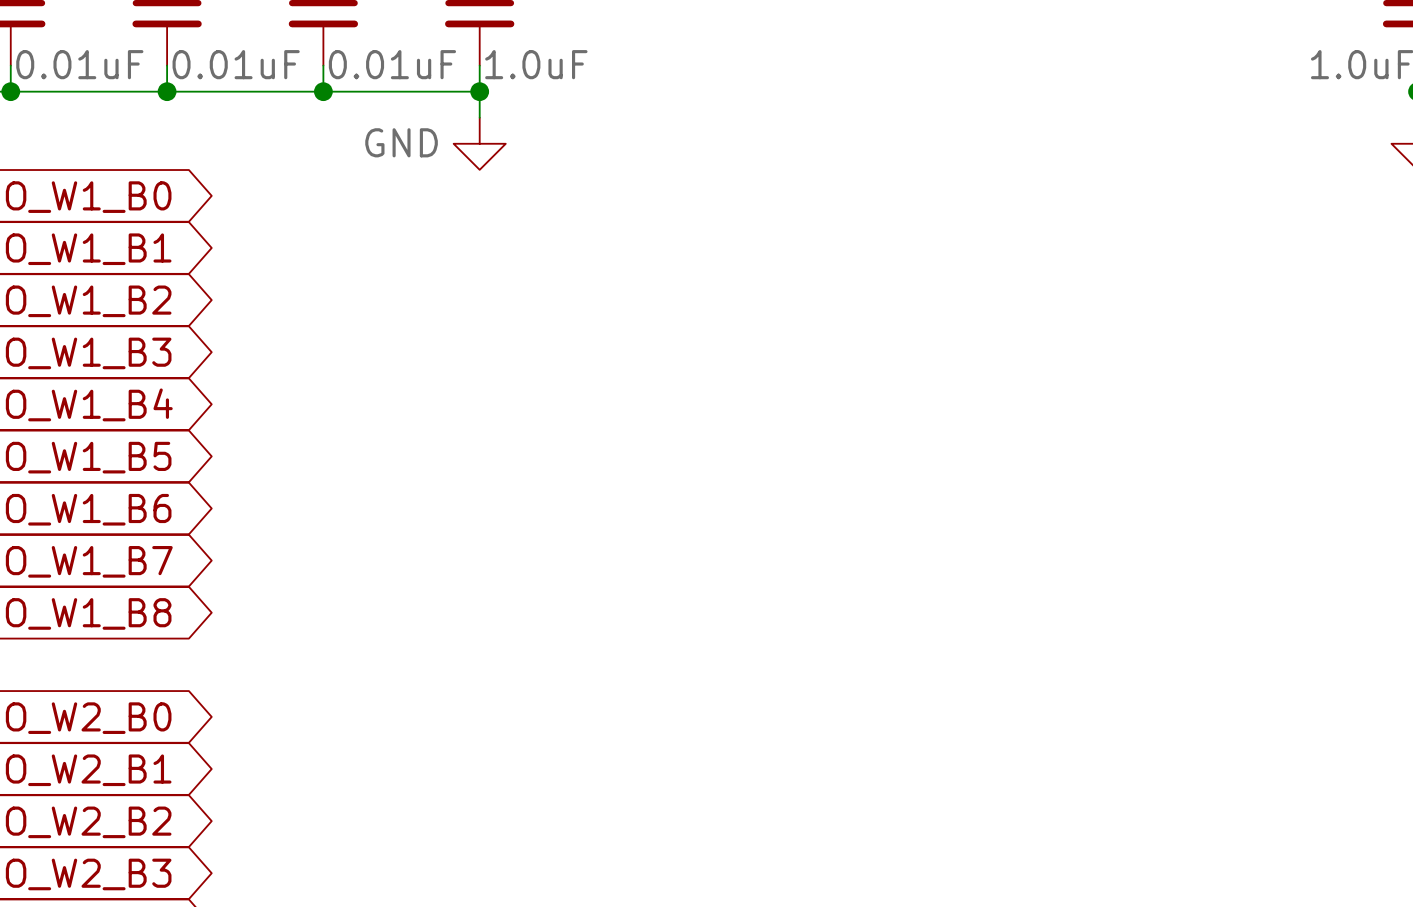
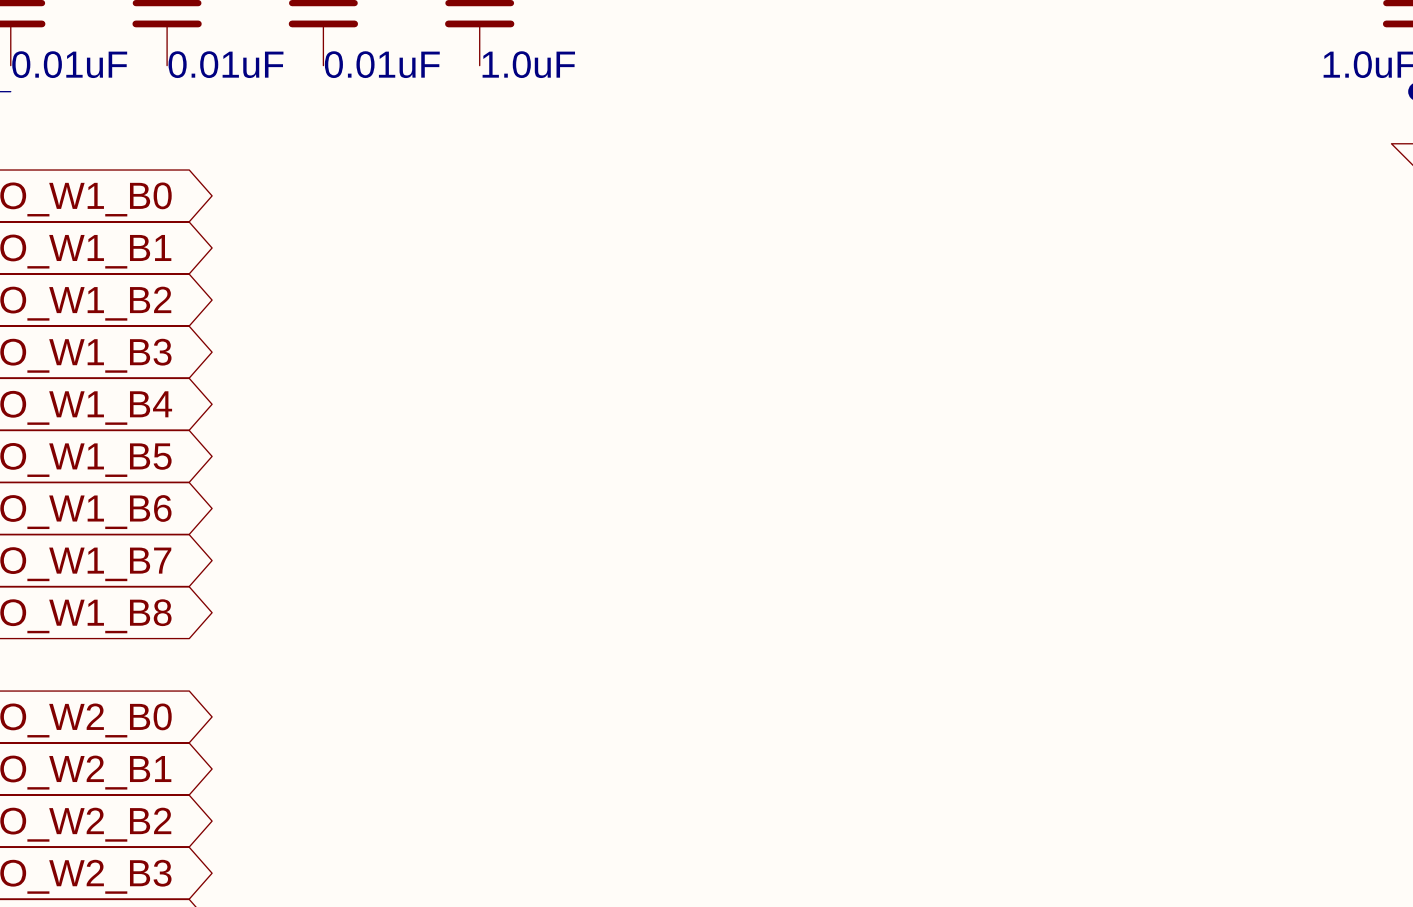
wire: (10, 65) (10, 91) (479, 91) -> none
wire: (167, 65) (167, 91) -> none
wire: (323, 65) (323, 91) -> none
wire: (479, 65) (479, 117) -> none
junction: (10, 91) -> none
junction: (167, 91) -> none
junction: (323, 91) -> none
junction: (479, 91) -> none
power symbol: GND (479, 143) -> none

